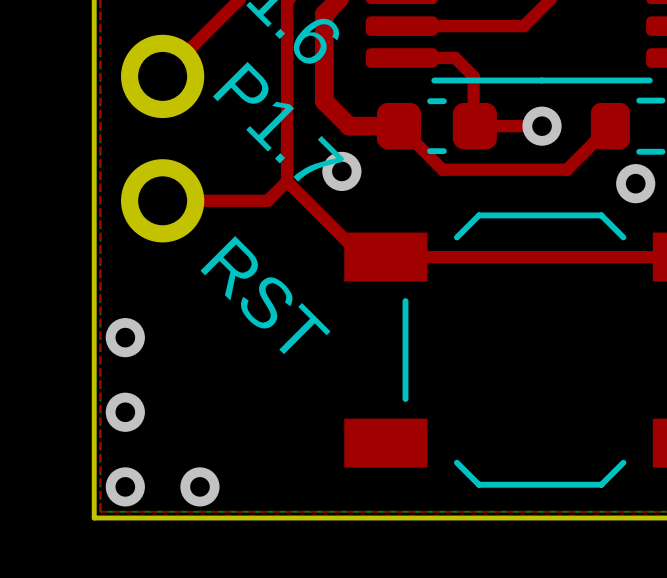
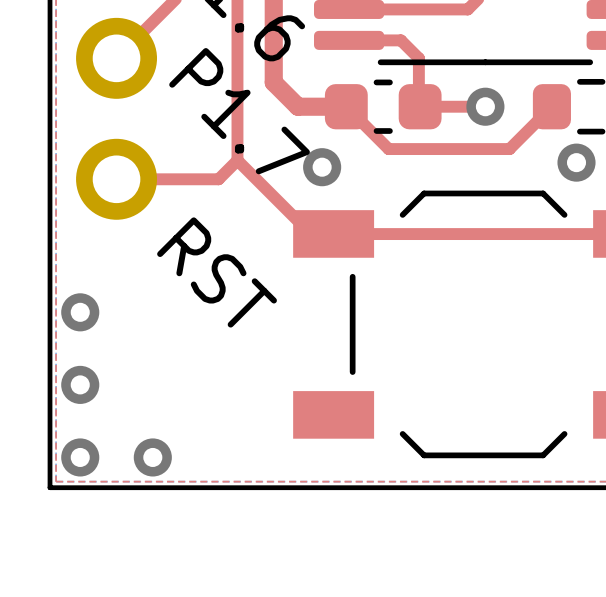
via position: (341, 171) -> (322, 167)

